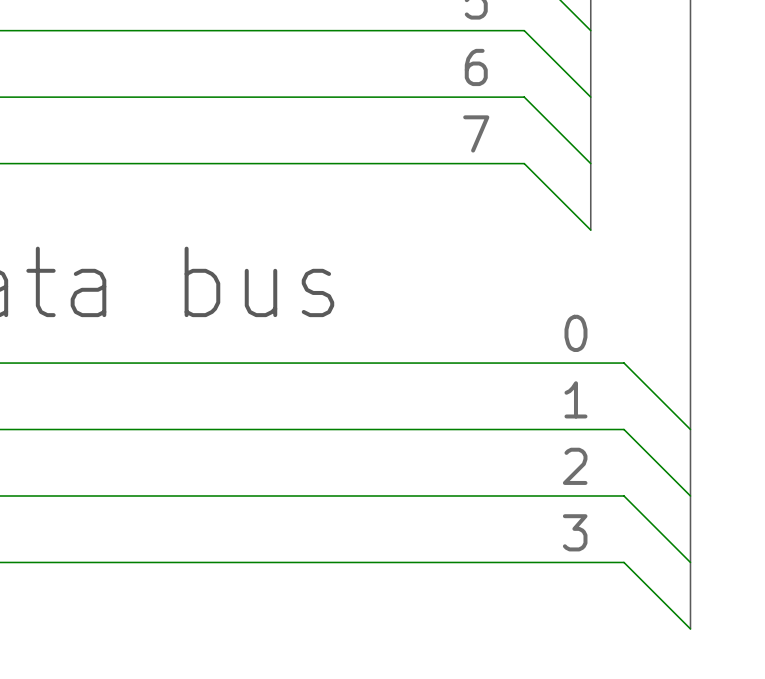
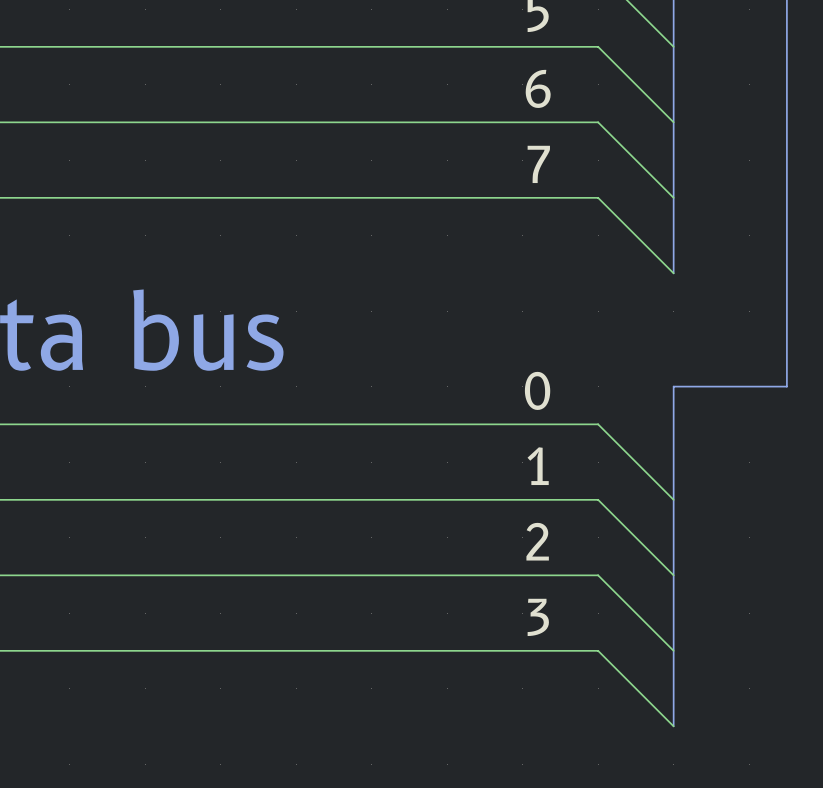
bus: (690, 329) (690, 628) -> (786, 386) (673, 386) (673, 726)
label position: 0 (575, 333) -> 0 (537, 390)
wire: (524, 363) (624, 363) (690, 429) -> (598, 424) (673, 499)
label position: 1 (575, 399) -> 1 (538, 466)
wire: (524, 429) (624, 429) (690, 496) -> (598, 499) (673, 575)
label position: 2 (575, 466) -> 2 (537, 541)
wire: (524, 496) (624, 496) (690, 562) -> (598, 575) (673, 650)
label position: 3 (575, 532) -> 3 (538, 617)
wire: (524, 562) (624, 562) (690, 628) -> (598, 650) (673, 726)

